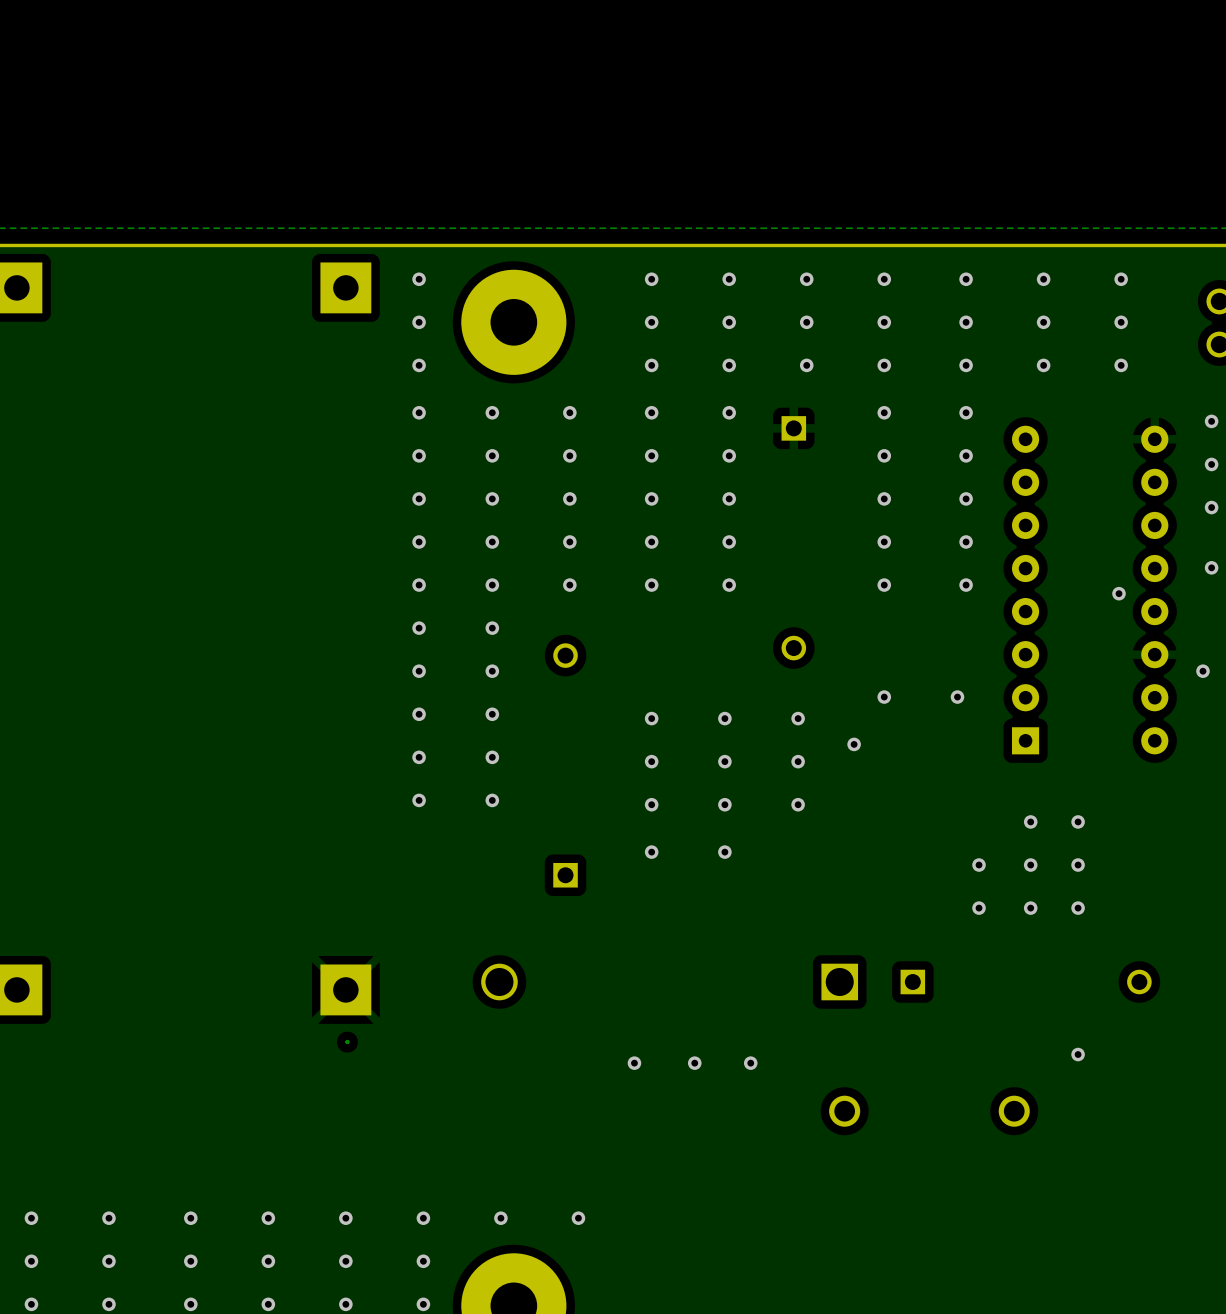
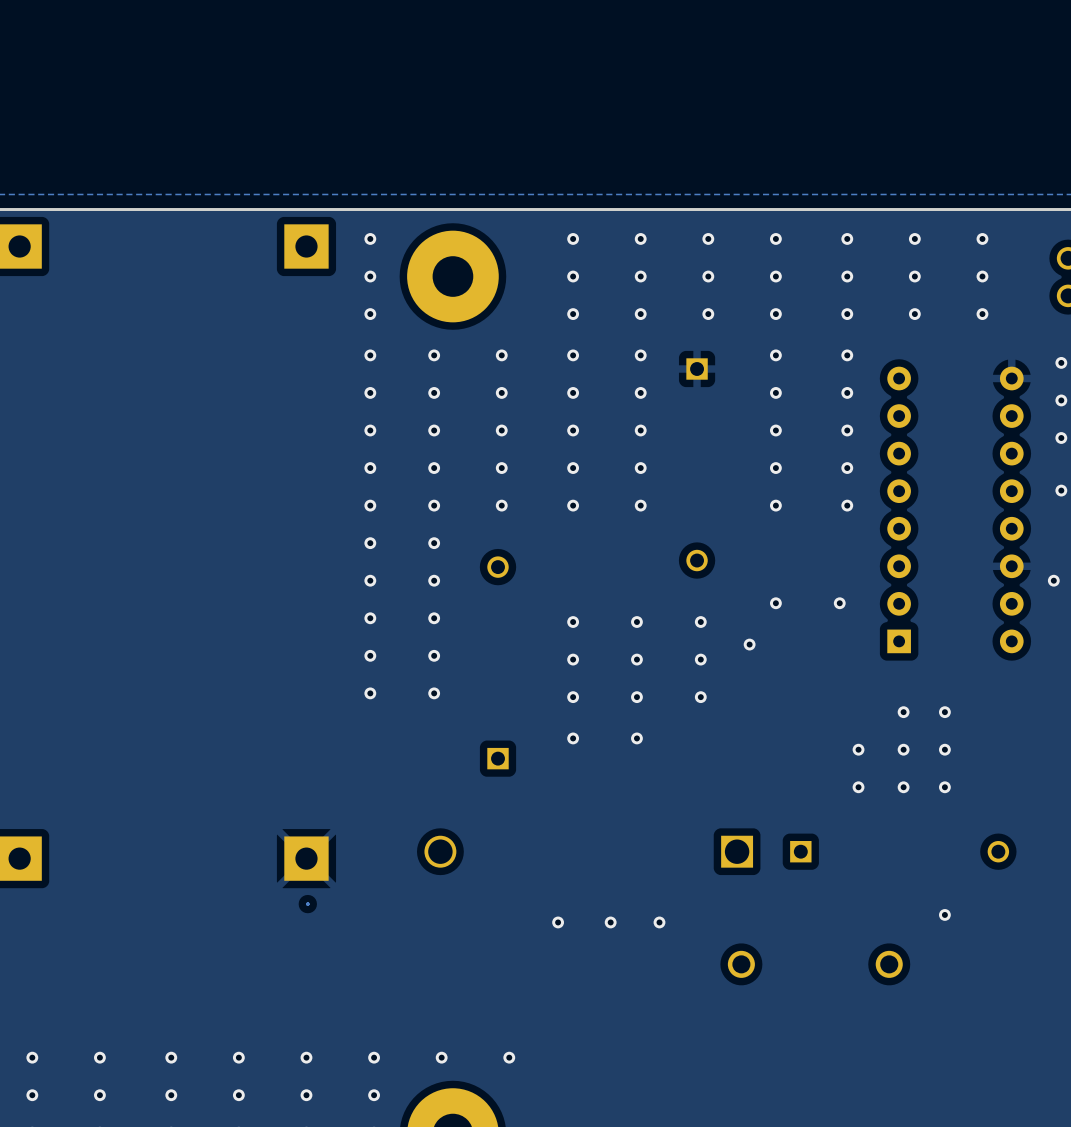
via: (1119, 593) -> none

